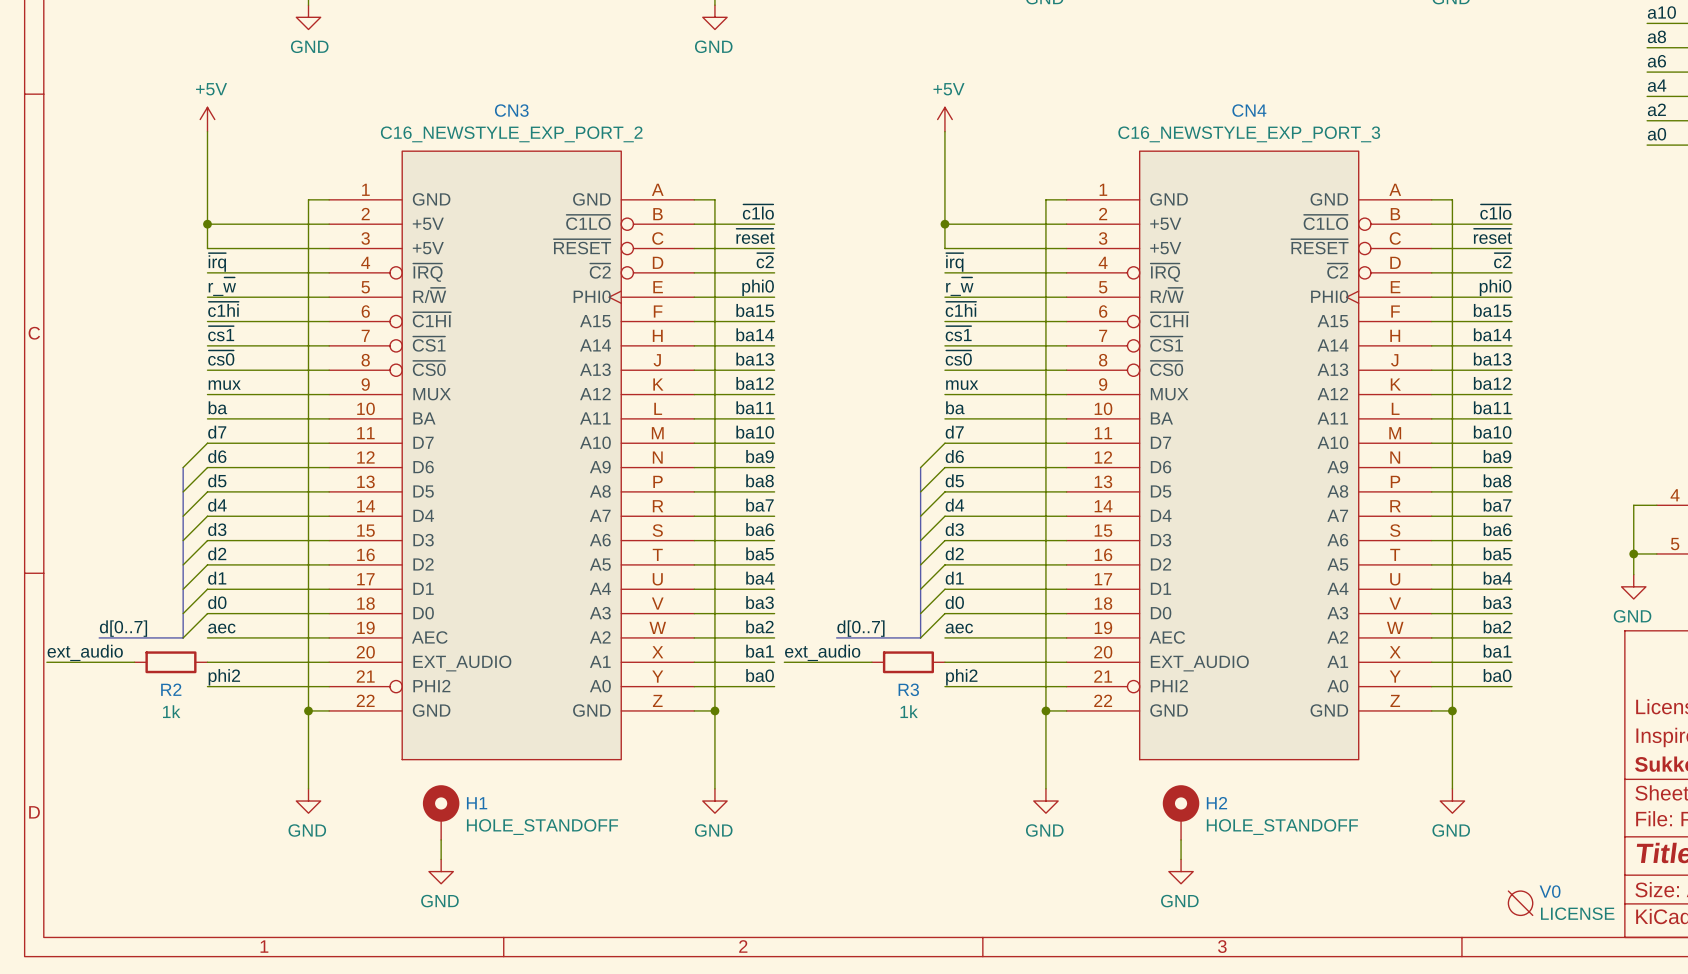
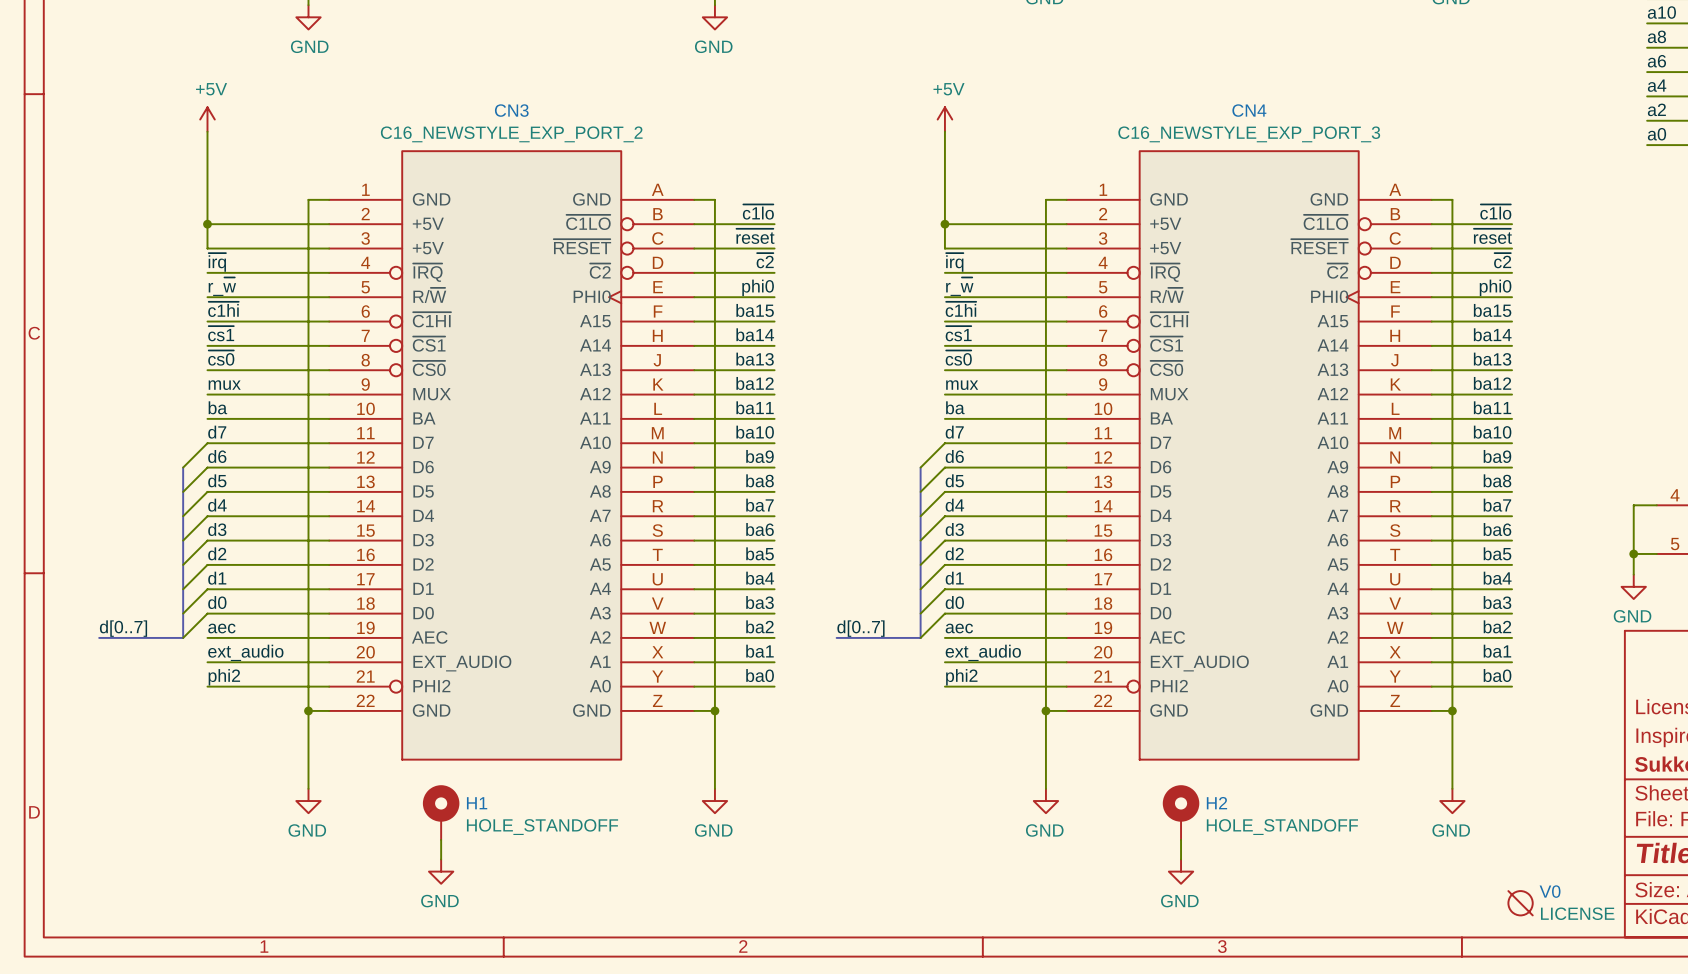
label position: ext_audio (85, 652) -> ext_audio (245, 652)
label position: ext_audio (822, 652) -> ext_audio (983, 652)
wire: (46, 662) (134, 662) -> none
R2: 1k (170, 662) -> none
wire: (784, 662) (871, 662) -> none
R3: 1k (908, 662) -> none

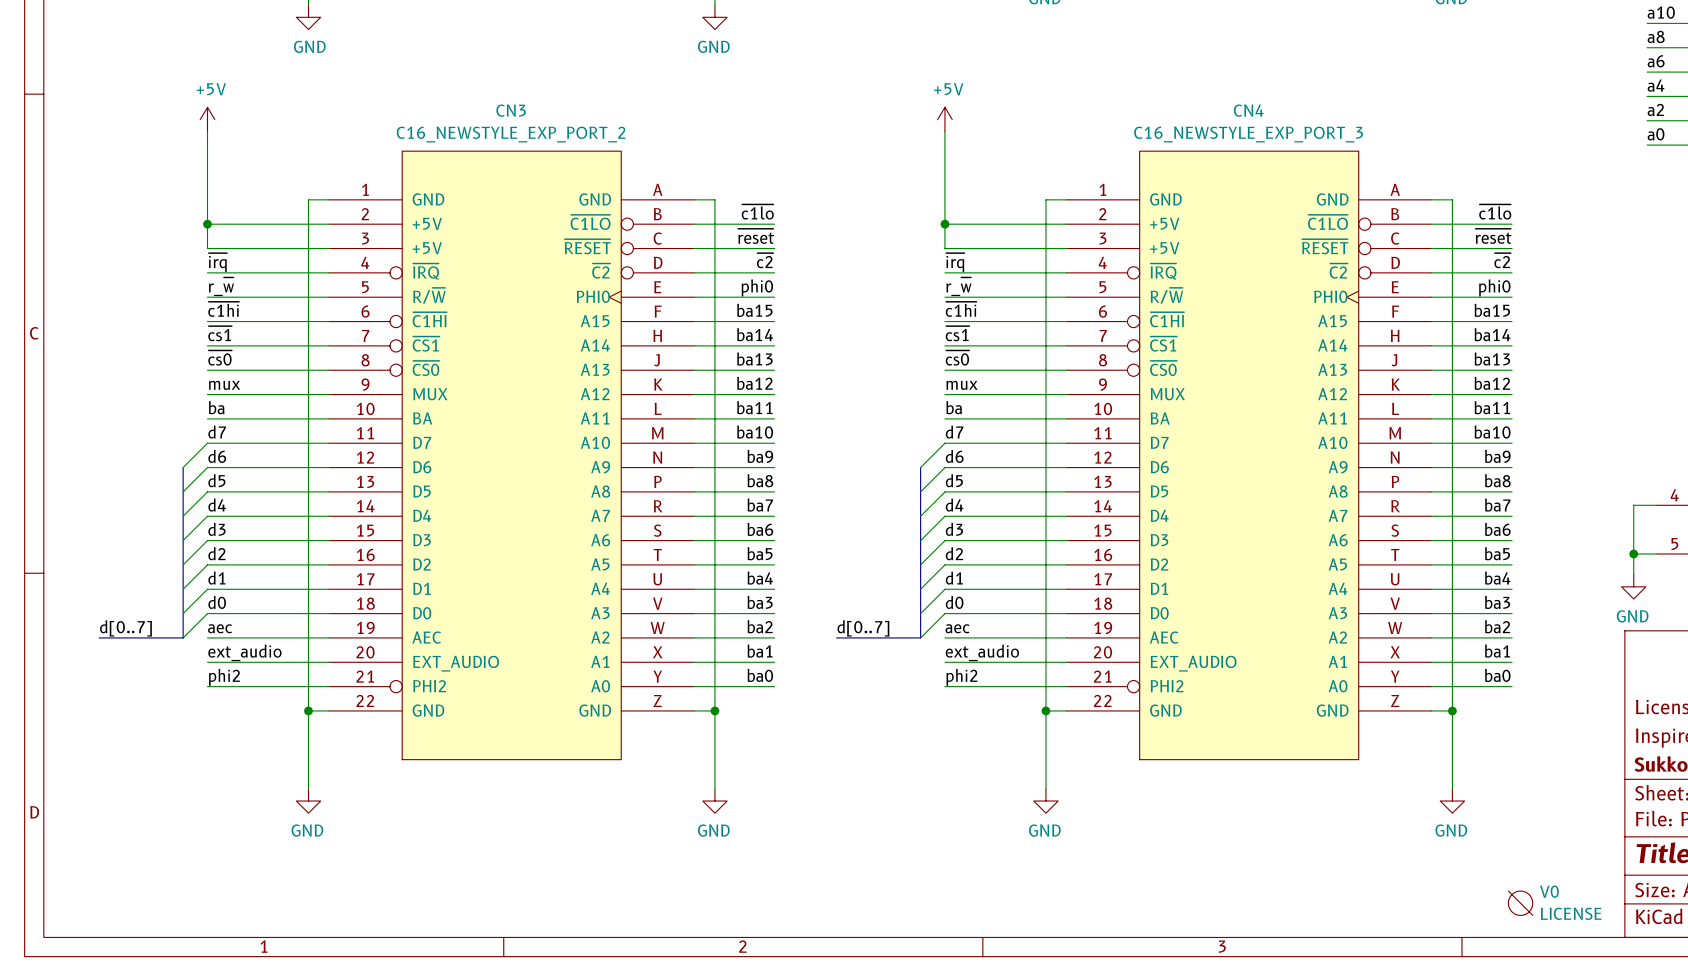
H1: HOLE_STANDOFF (441, 812) -> none
H2: HOLE_STANDOFF (1181, 812) -> none
wire: (441, 839) (441, 859) -> none
wire: (1181, 839) (1181, 859) -> none
power symbol: GND (441, 871) -> none
power symbol: GND (1181, 871) -> none

